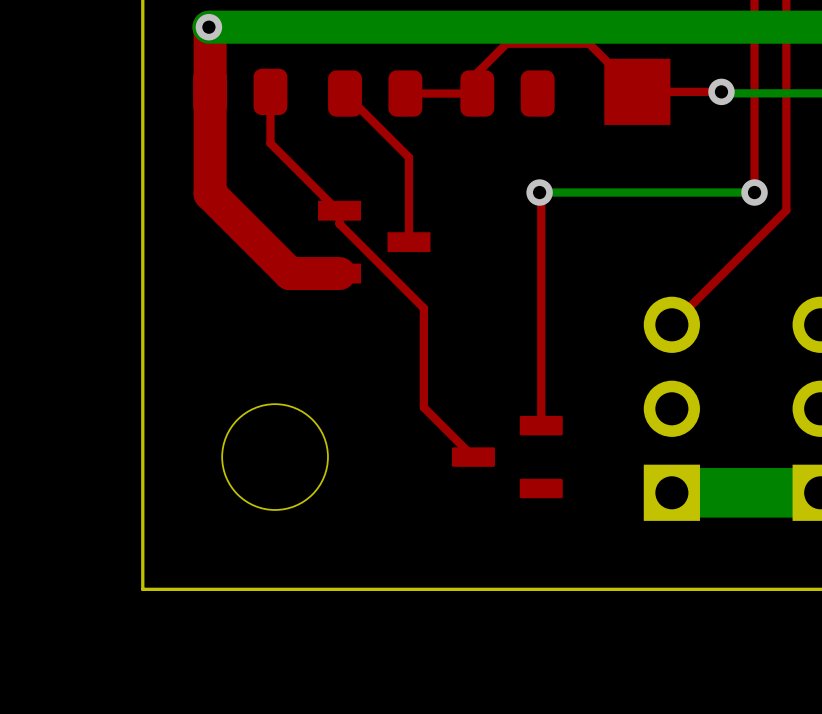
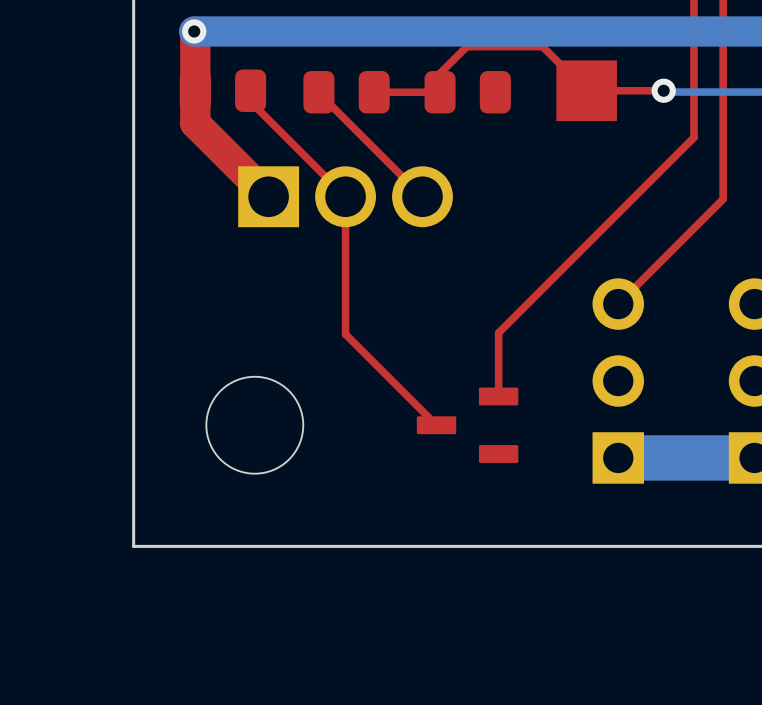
top track: (345, 93) (408, 157) (408, 242) -> (318, 93) (422, 196)
top track: (270, 103) (270, 143) (339, 210) (339, 223) (423, 308) (423, 407) -> (250, 101) (345, 196) (345, 334) (391, 379)
top track: (210, 127) (210, 193) (289, 273) (339, 273) -> (195, 123) (268, 196)
top track: (754, 142) (754, 192) -> none
top track: (539, 192) (541, 194) (541, 356) -> (694, 137) (498, 332)
via: (539, 192) -> none
bottom track: (754, 192) (539, 192) -> none
via: (754, 192) -> none
part: none -> (345, 196)
part: (374, 242) -> none

